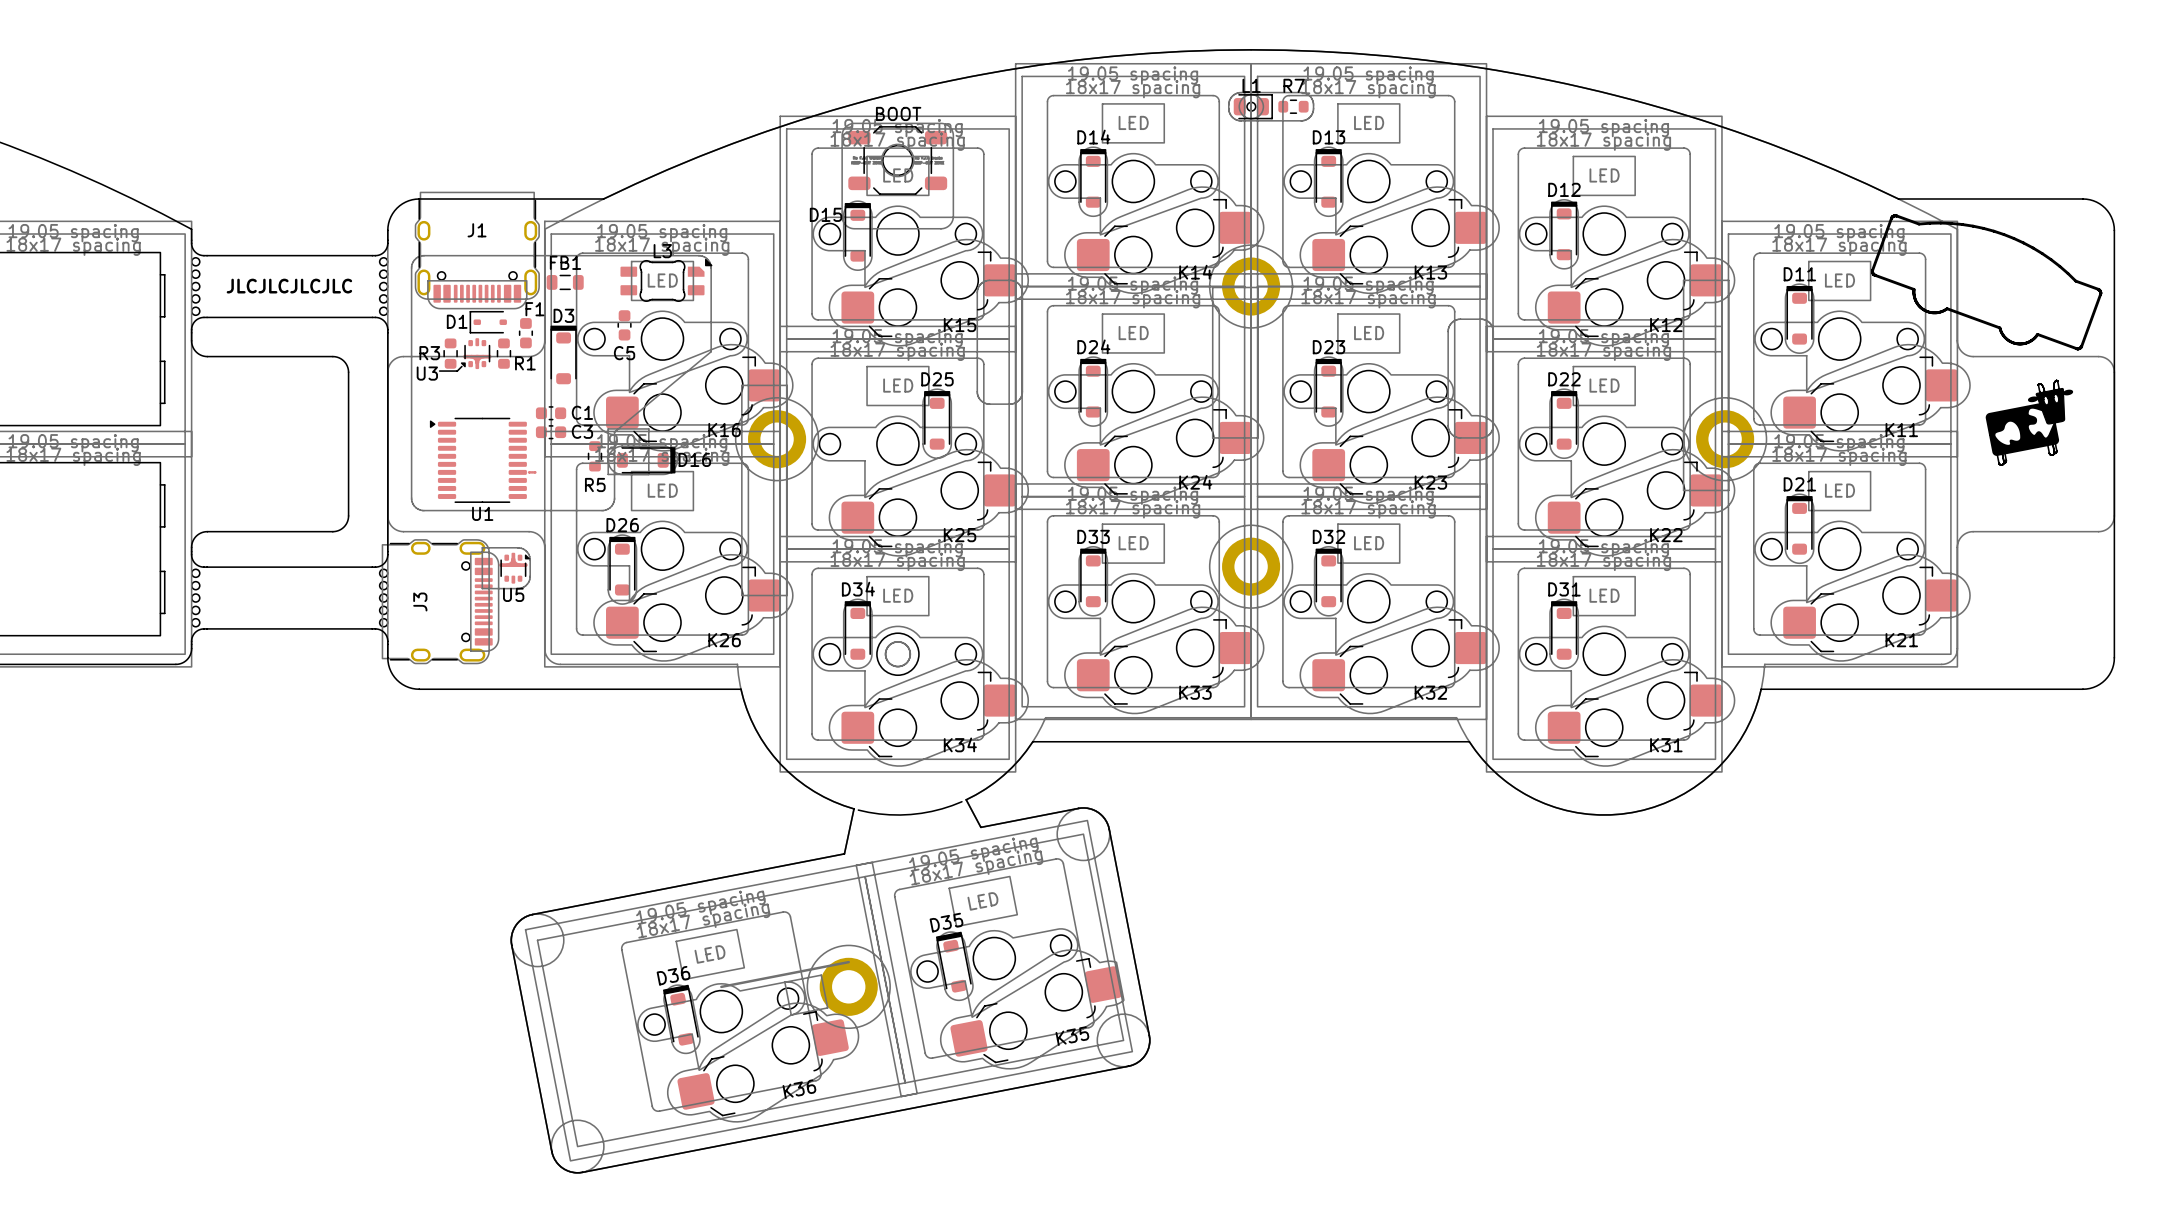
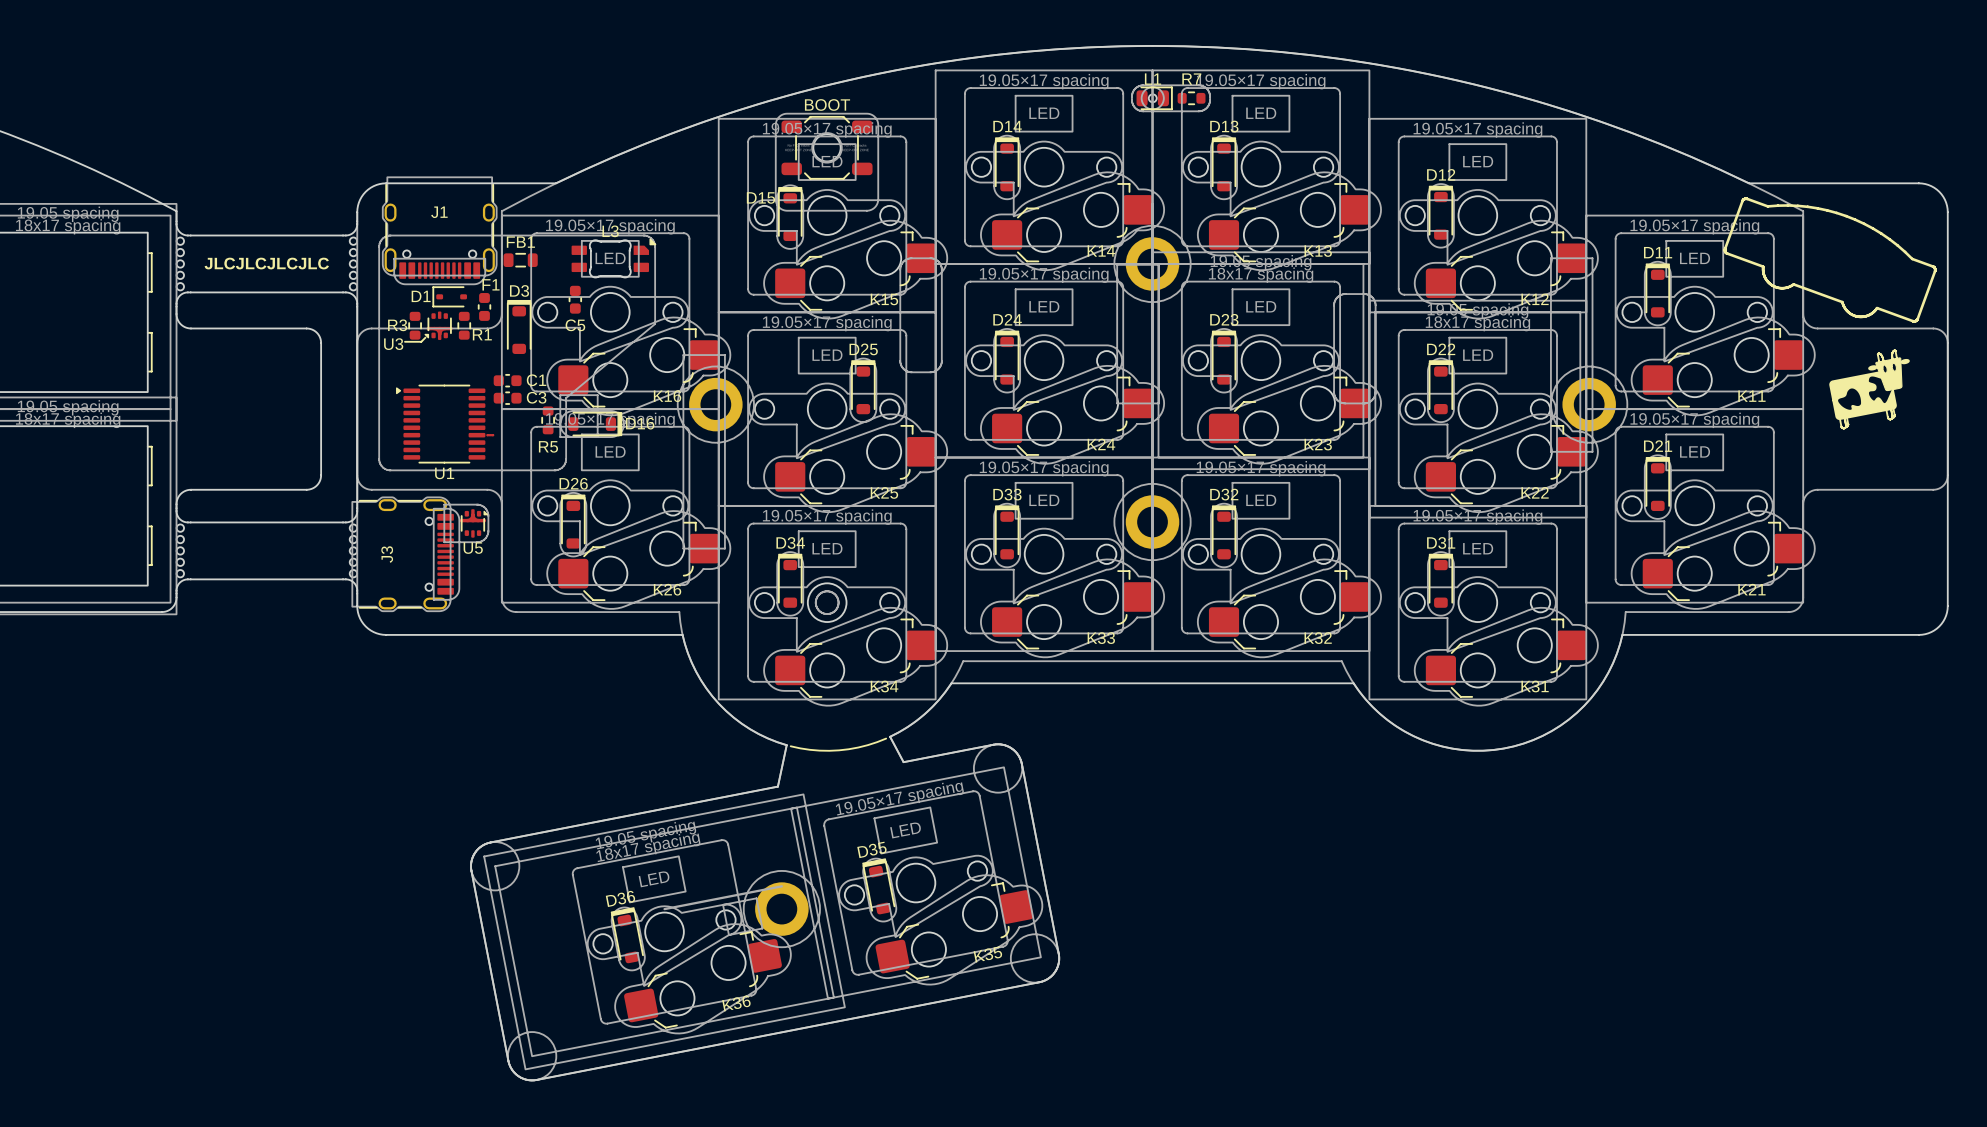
K14 footprint: [1015, 63, 1265, 300] -> [935, 69, 1165, 271]
K13 footprint: [1250, 63, 1500, 300] -> [1151, 69, 1382, 271]
K15 footprint: [779, 115, 1029, 353] -> [718, 118, 948, 320]
K12 footprint: [1485, 115, 1736, 353] -> [1368, 118, 1599, 320]
K16 footprint: [544, 220, 794, 458] -> [501, 215, 731, 416]
K11 footprint: [1721, 220, 1971, 458] -> [1585, 215, 1816, 416]
K24 footprint: [1015, 273, 1265, 510] -> [935, 263, 1165, 465]
K25 footprint: [779, 325, 1029, 563] -> [718, 311, 948, 513]
K26 footprint: [544, 430, 794, 668] -> [501, 408, 731, 610]
K21 footprint: [1721, 430, 1971, 668] -> [1585, 408, 1816, 610]
K33 footprint: [1015, 483, 1265, 721] -> [935, 456, 1165, 658]
K32 footprint: [1250, 483, 1500, 721] -> [1151, 456, 1382, 658]
K34 footprint: [779, 535, 1029, 773] -> [718, 505, 948, 707]
K31 footprint: [1485, 535, 1736, 773] -> [1368, 505, 1599, 707]
K35 footprint: [855, 819, 1133, 1098] -> [790, 766, 1043, 1000]

